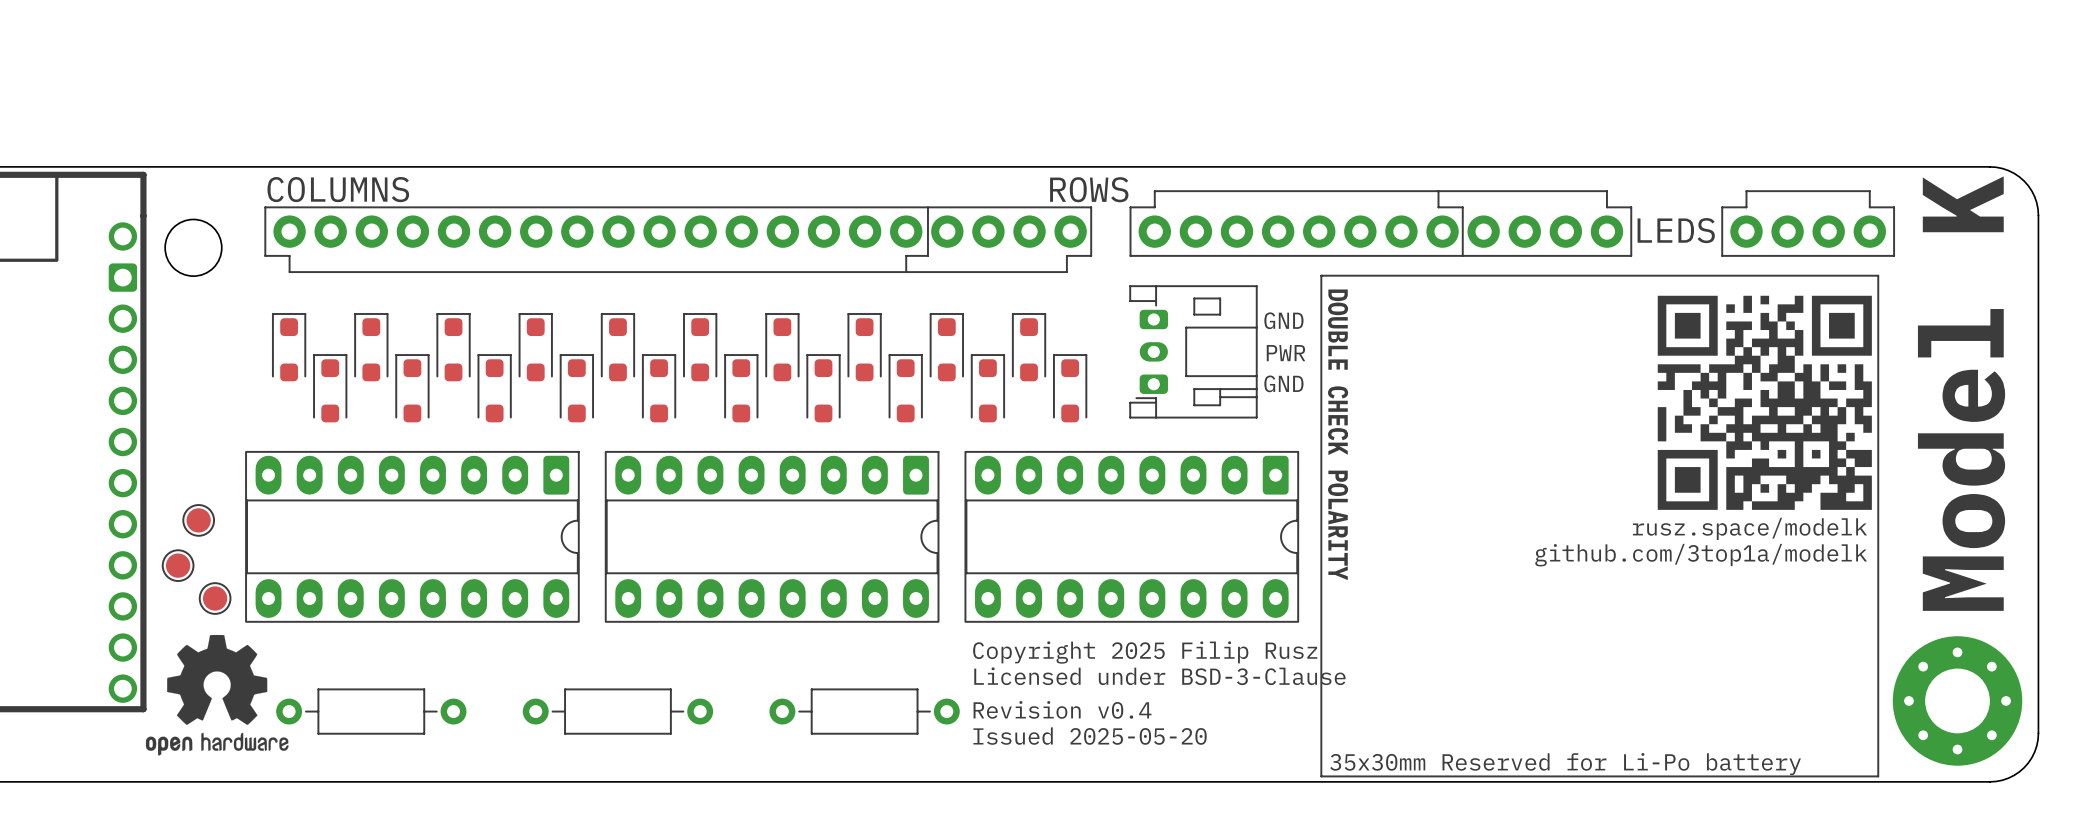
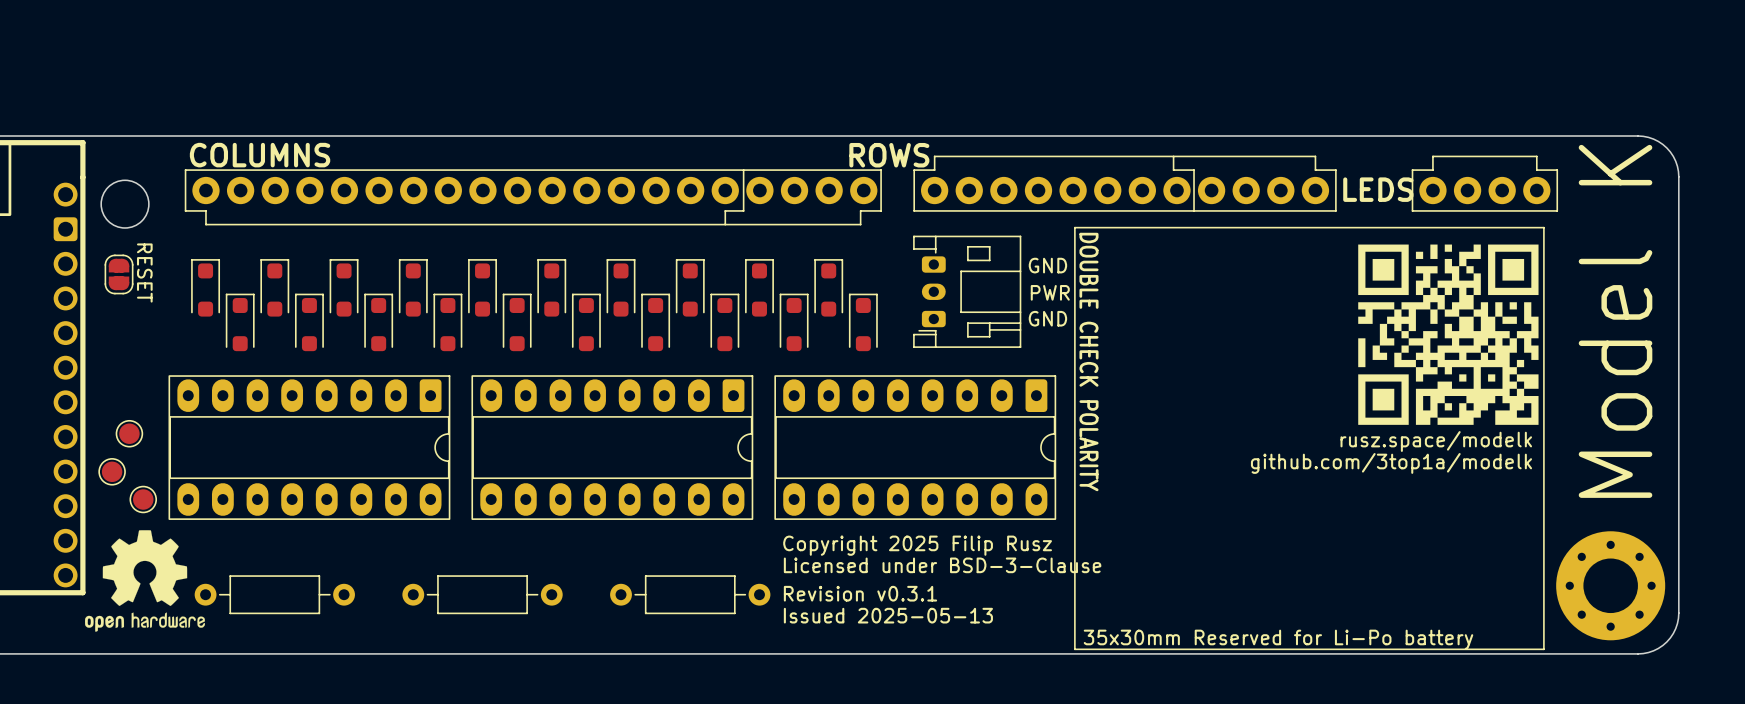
text: none -> RESET (144, 273)
part: none -> (119, 274)
text: Revision v0.4 (1062, 709) -> Revision v0.3.1 (860, 593)
text: Issued 2025-05-20 (1090, 736) -> Issued 2025-05-13 (888, 615)

